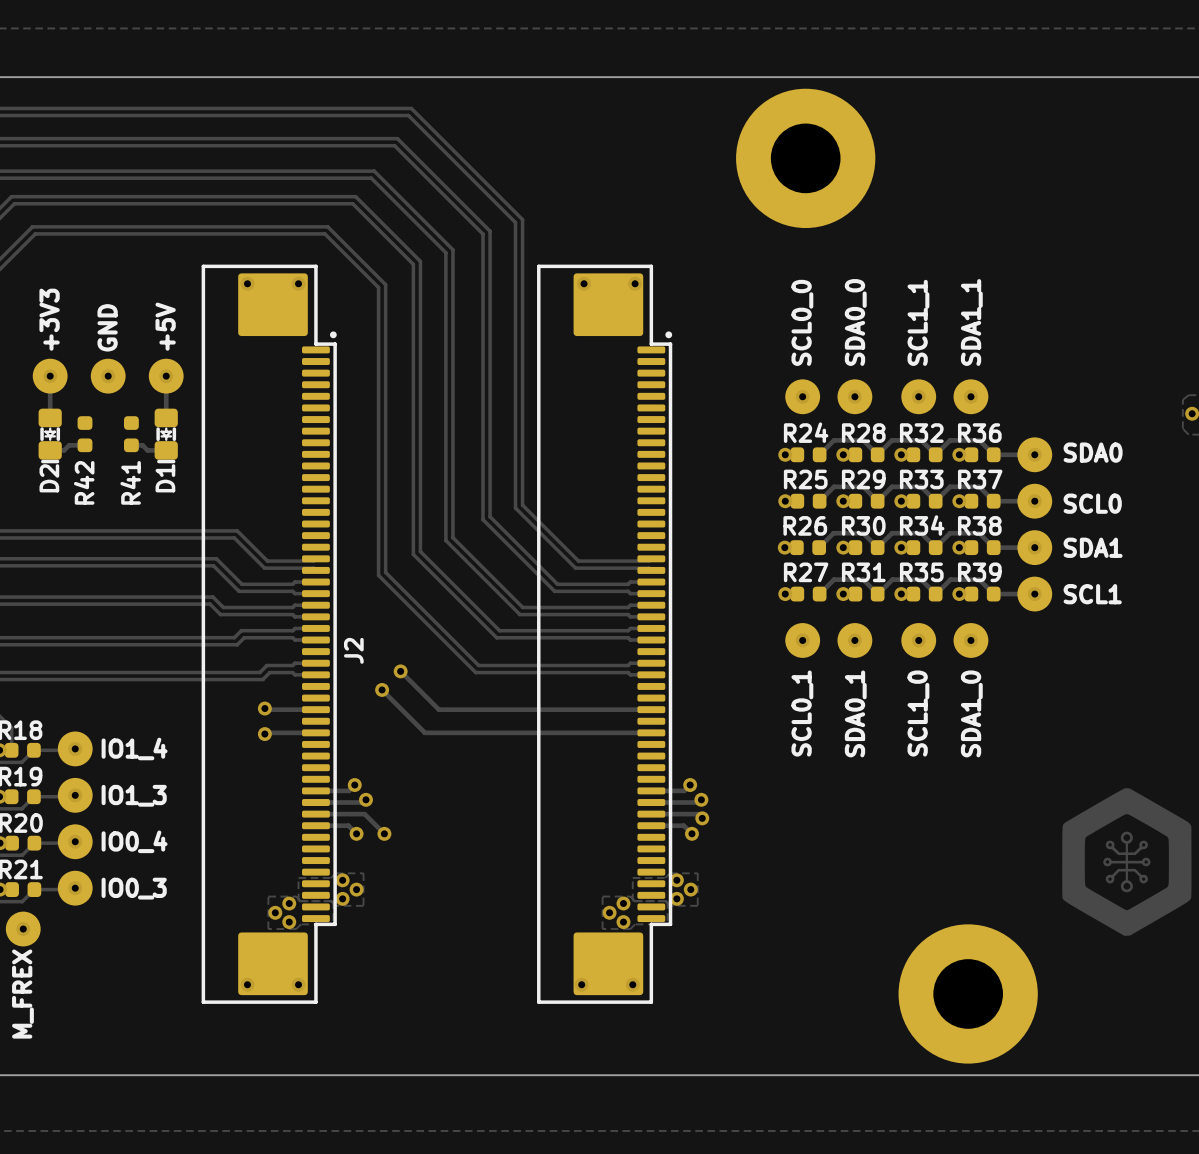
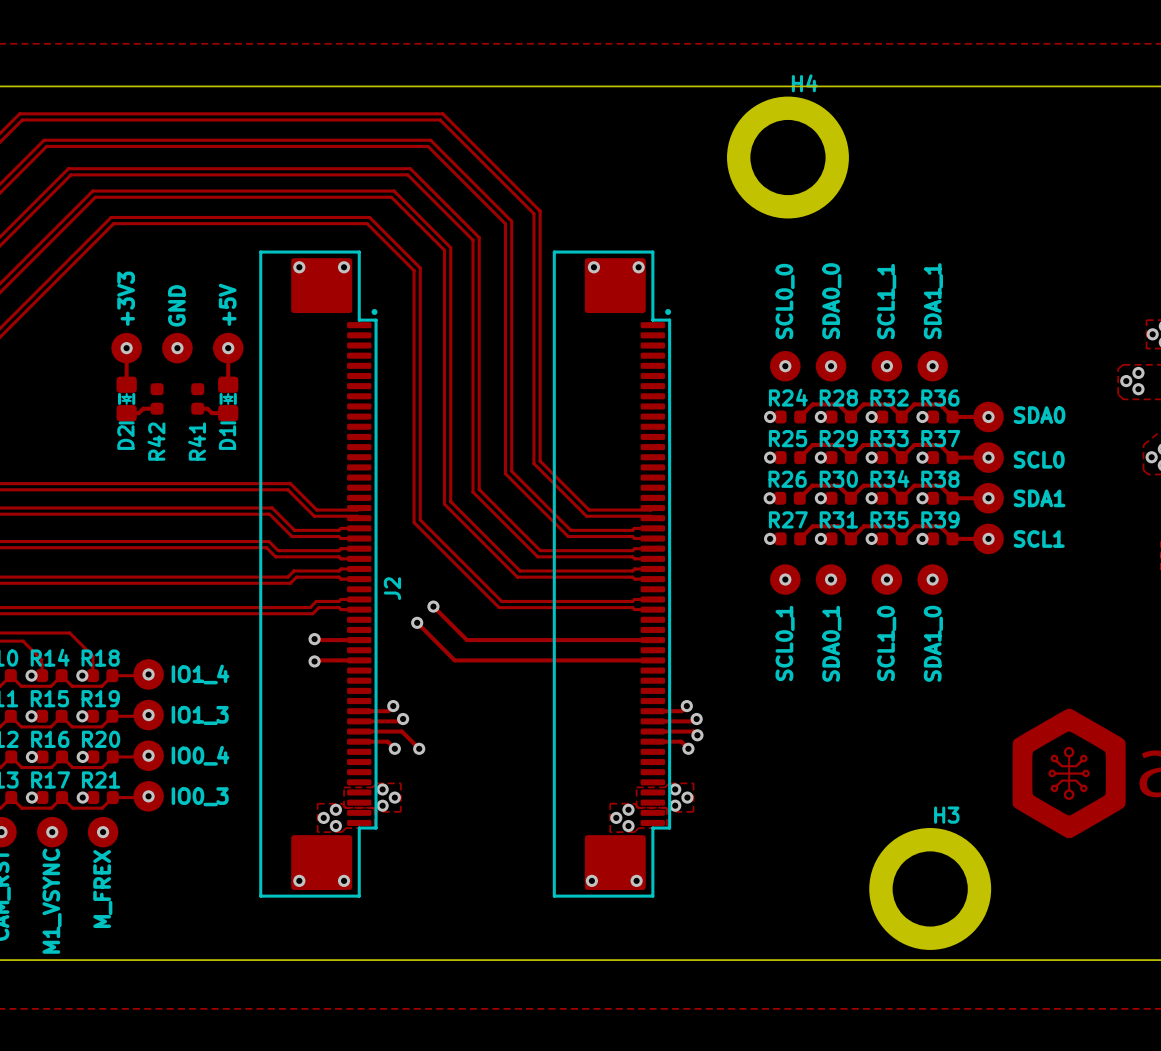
part: (805, 158) -> none
H4: none -> (787, 157)
part: (968, 993) -> none
H3: none -> (930, 888)

